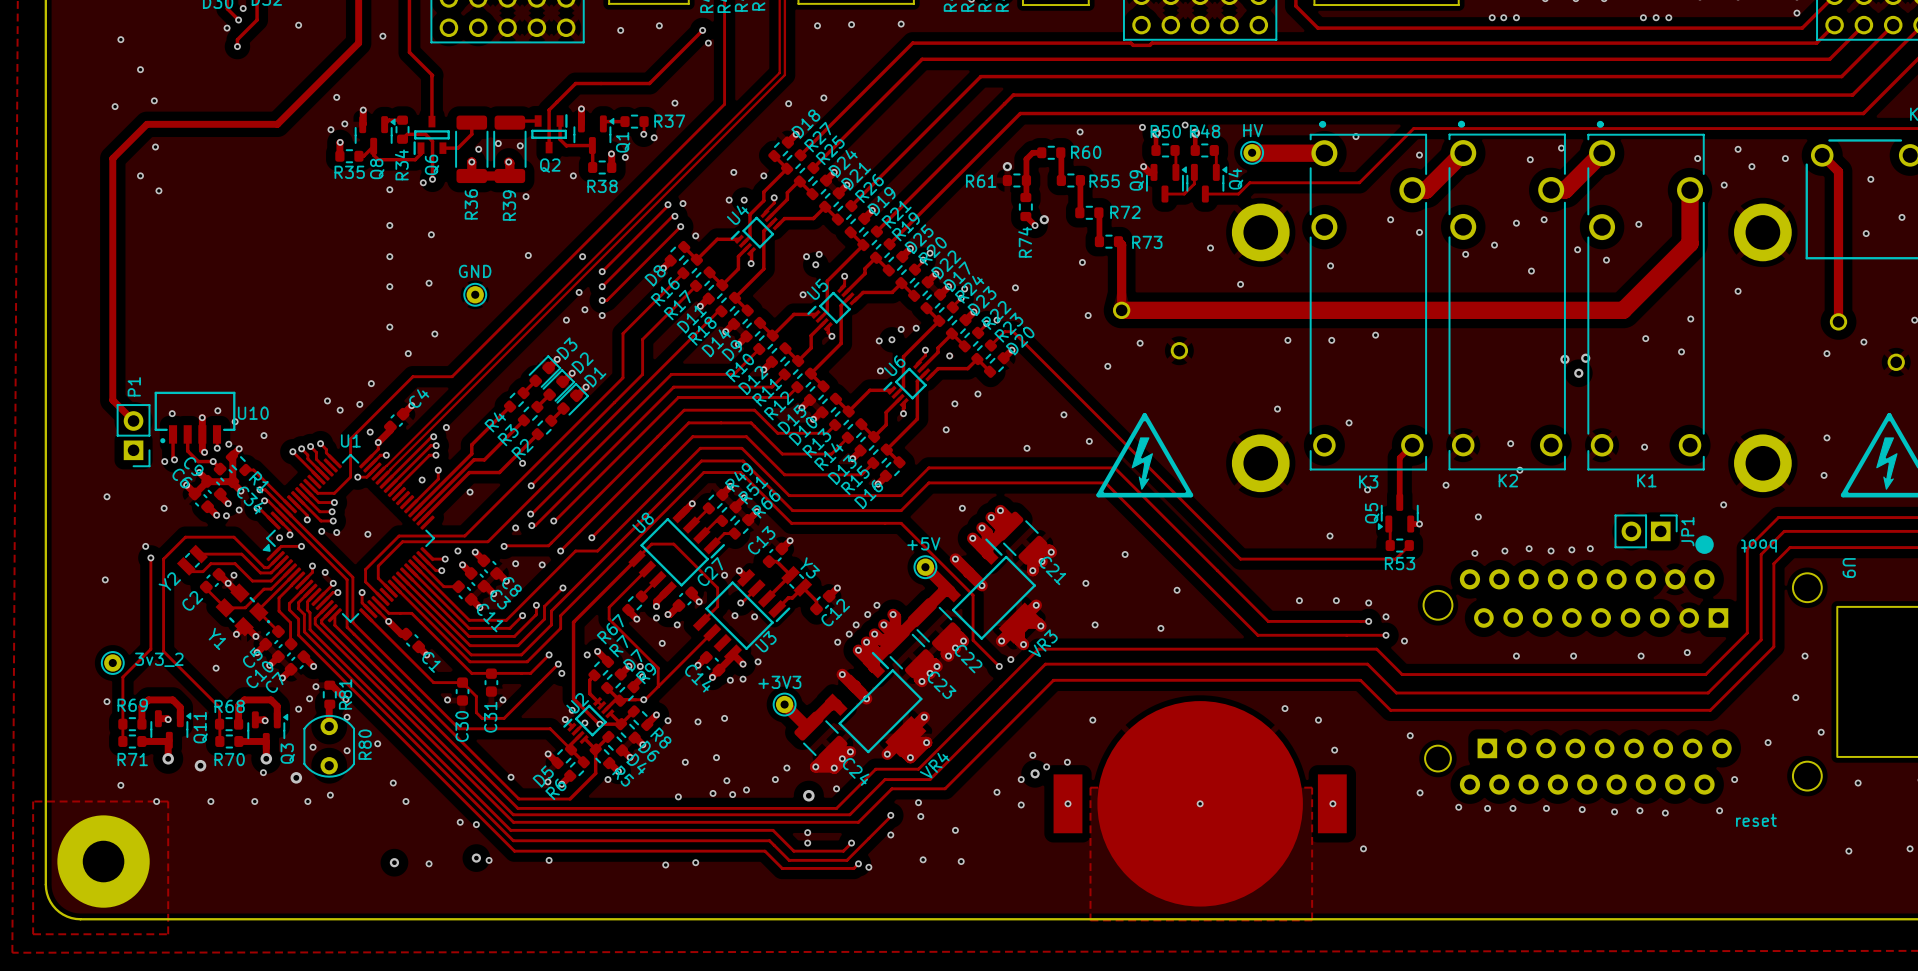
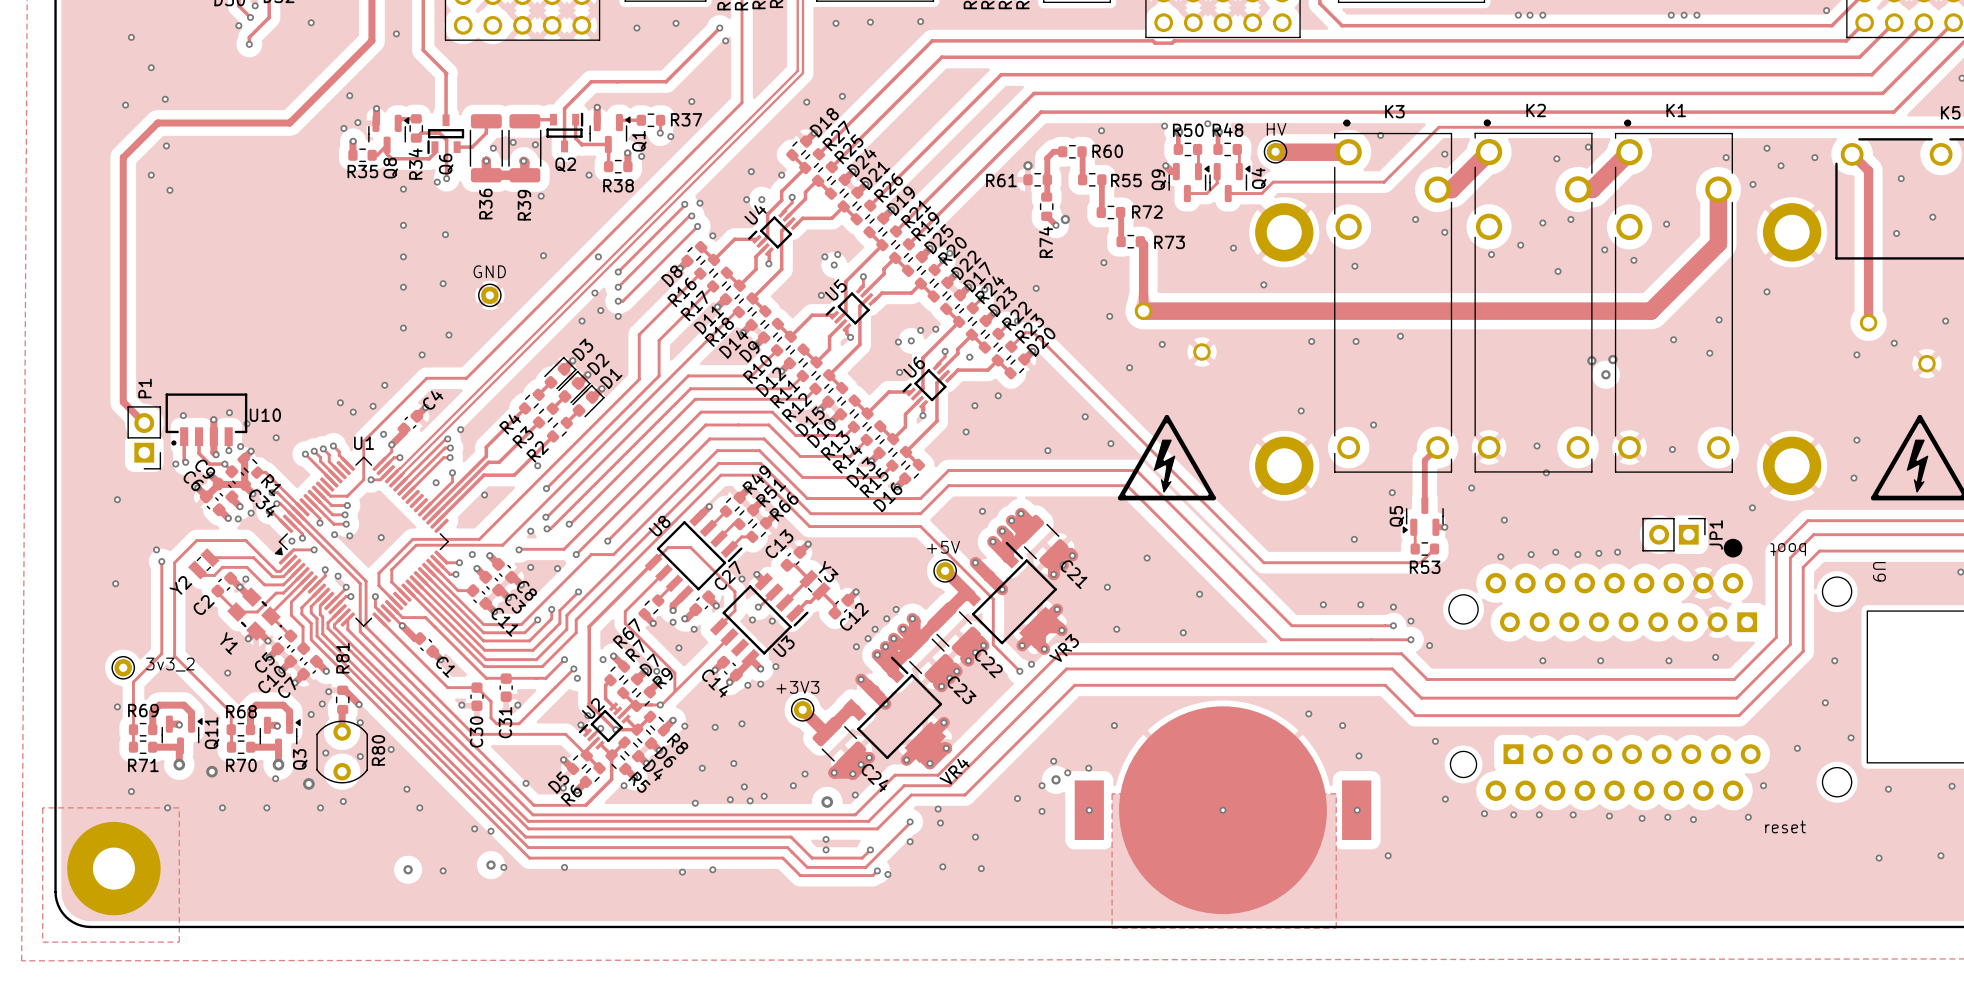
K2 name position: K2 (1508, 480) -> K2 (1536, 110)
K1 name position: K1 (1646, 480) -> K1 (1676, 110)
K3 name position: K3 (1368, 481) -> K3 (1394, 111)
via: (164, 508) -> none
R81 name position: R81 (345, 694) -> R81 (342, 658)

